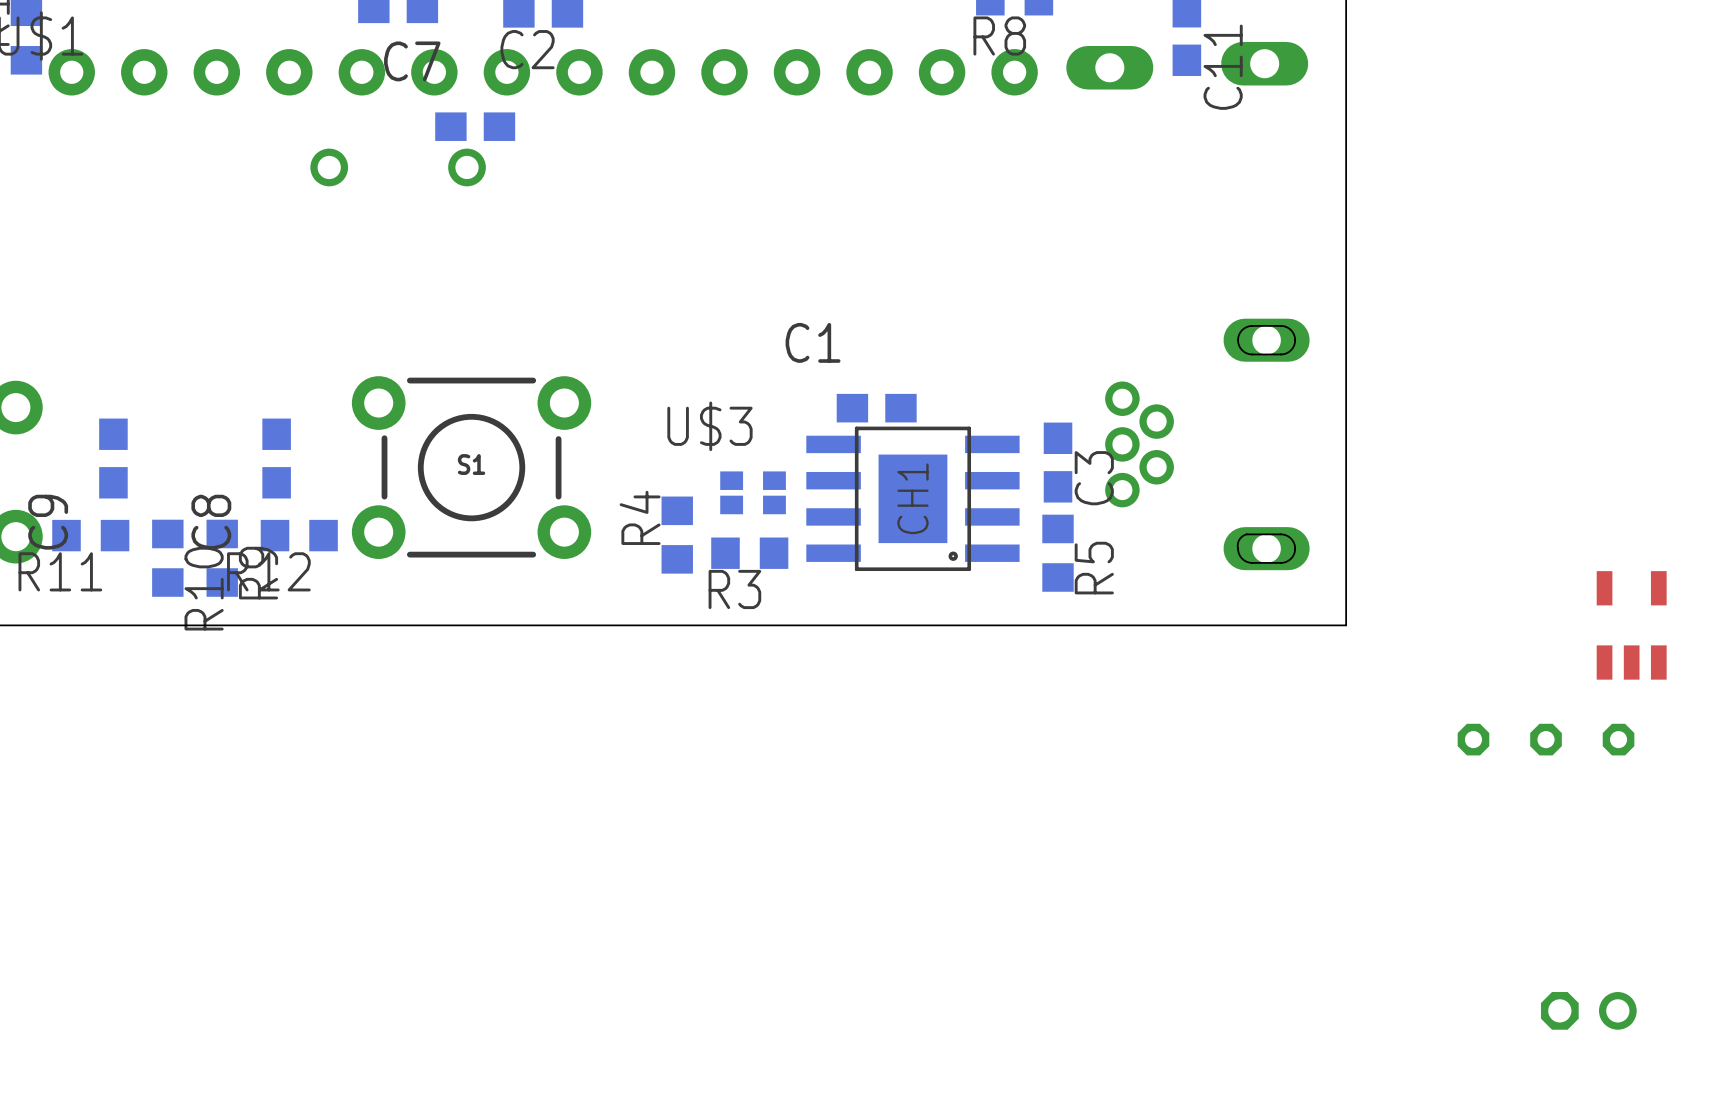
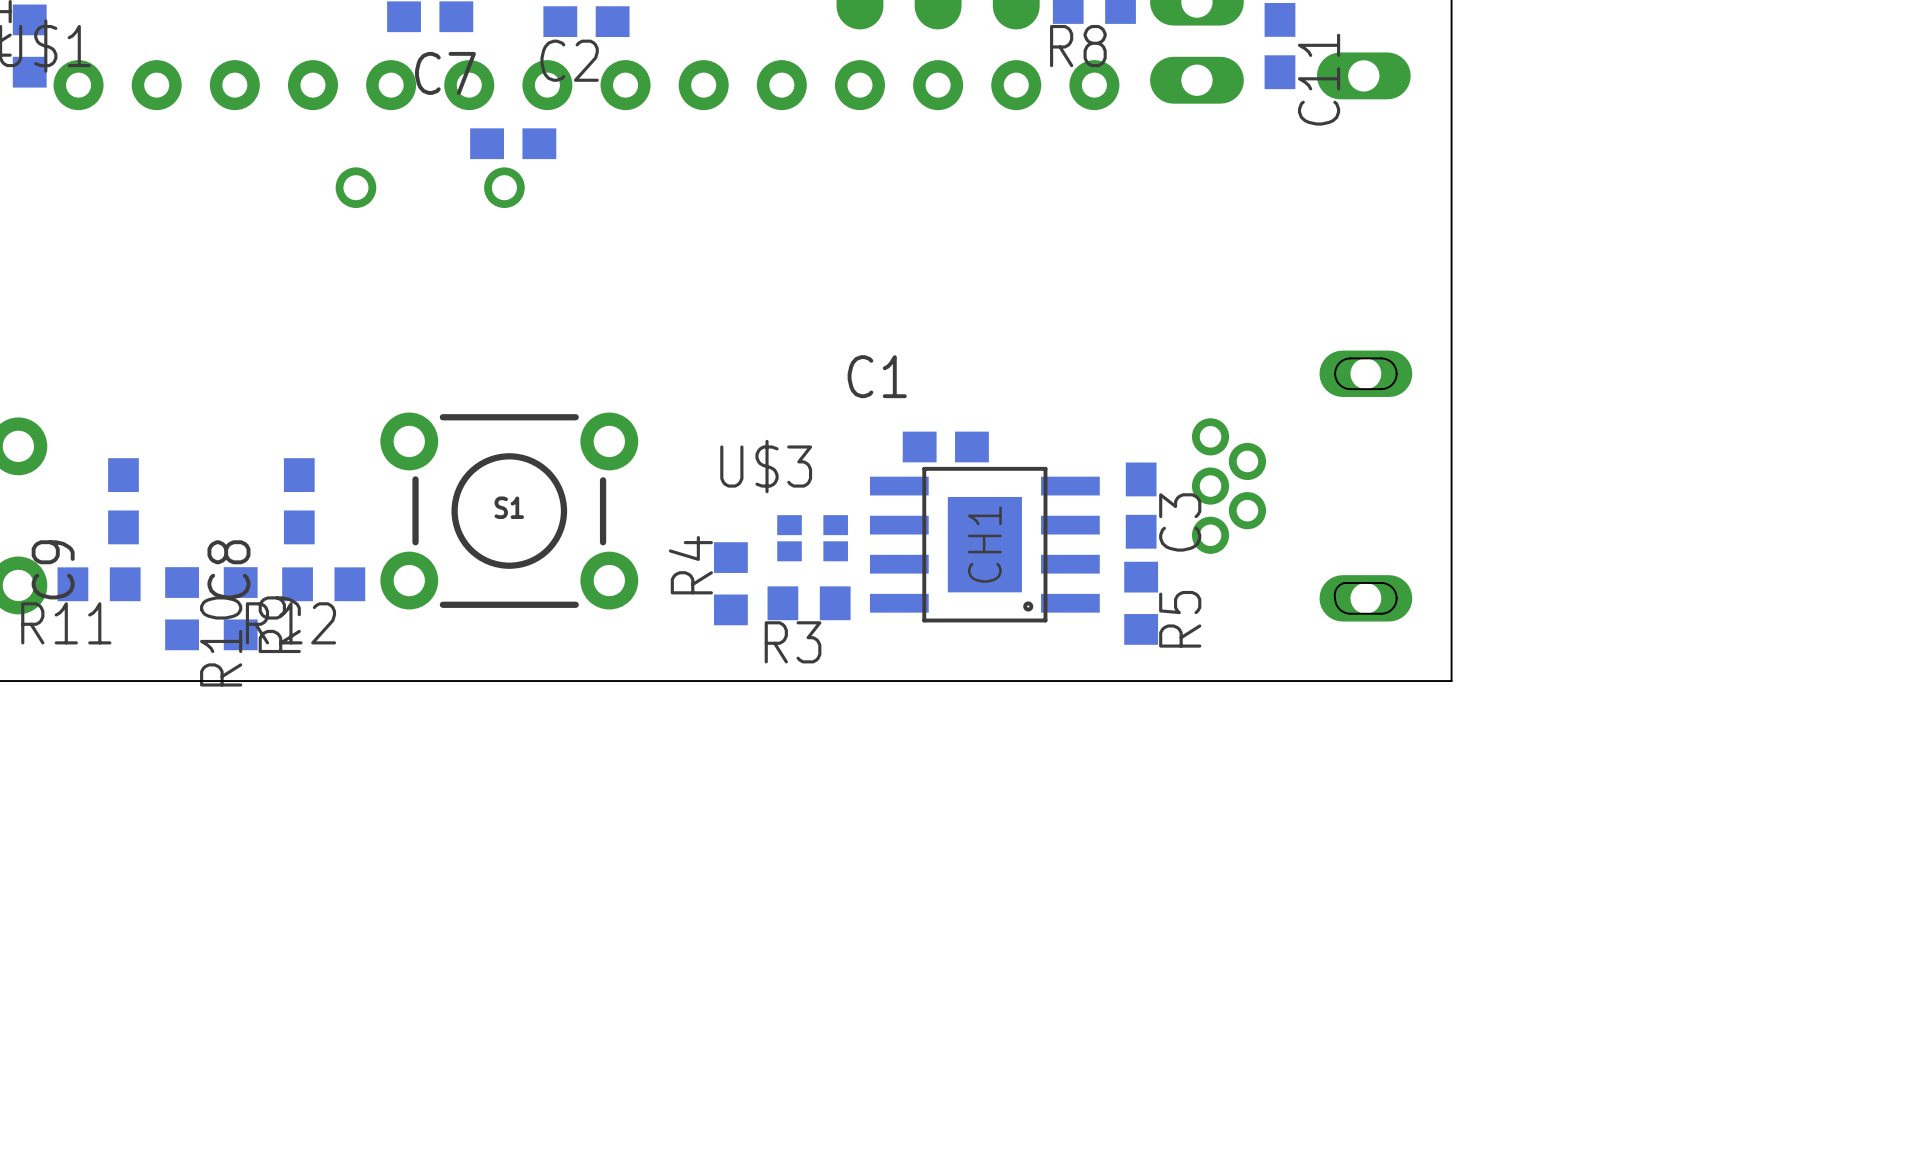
part: (1631, 625) -> none
part: (1546, 739) -> none
part: (1588, 1010) -> none

